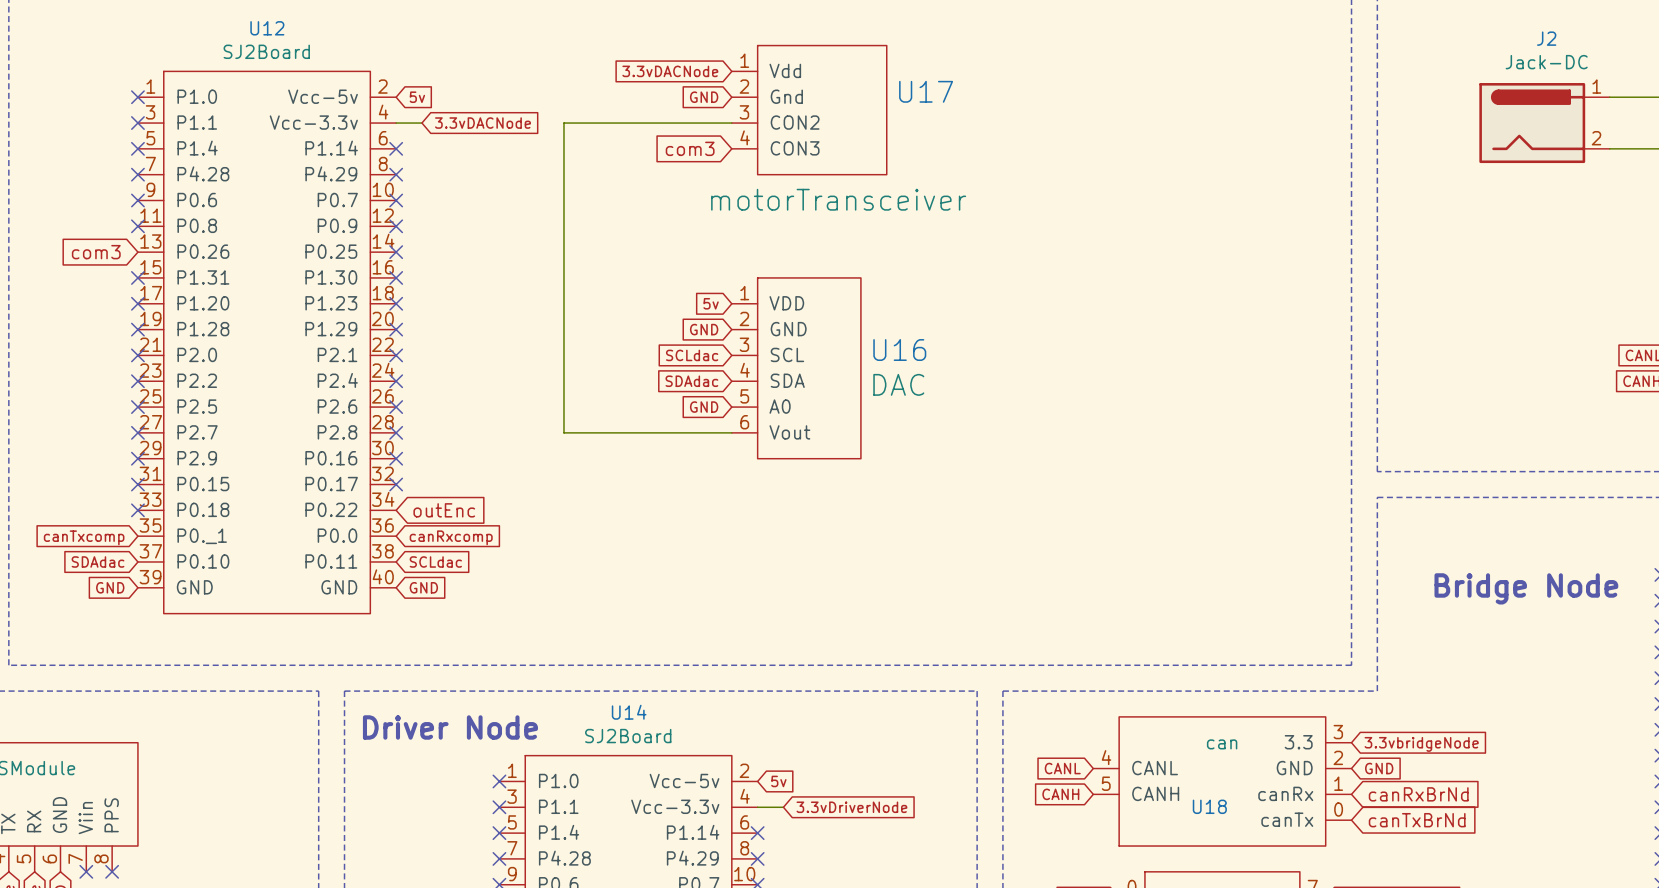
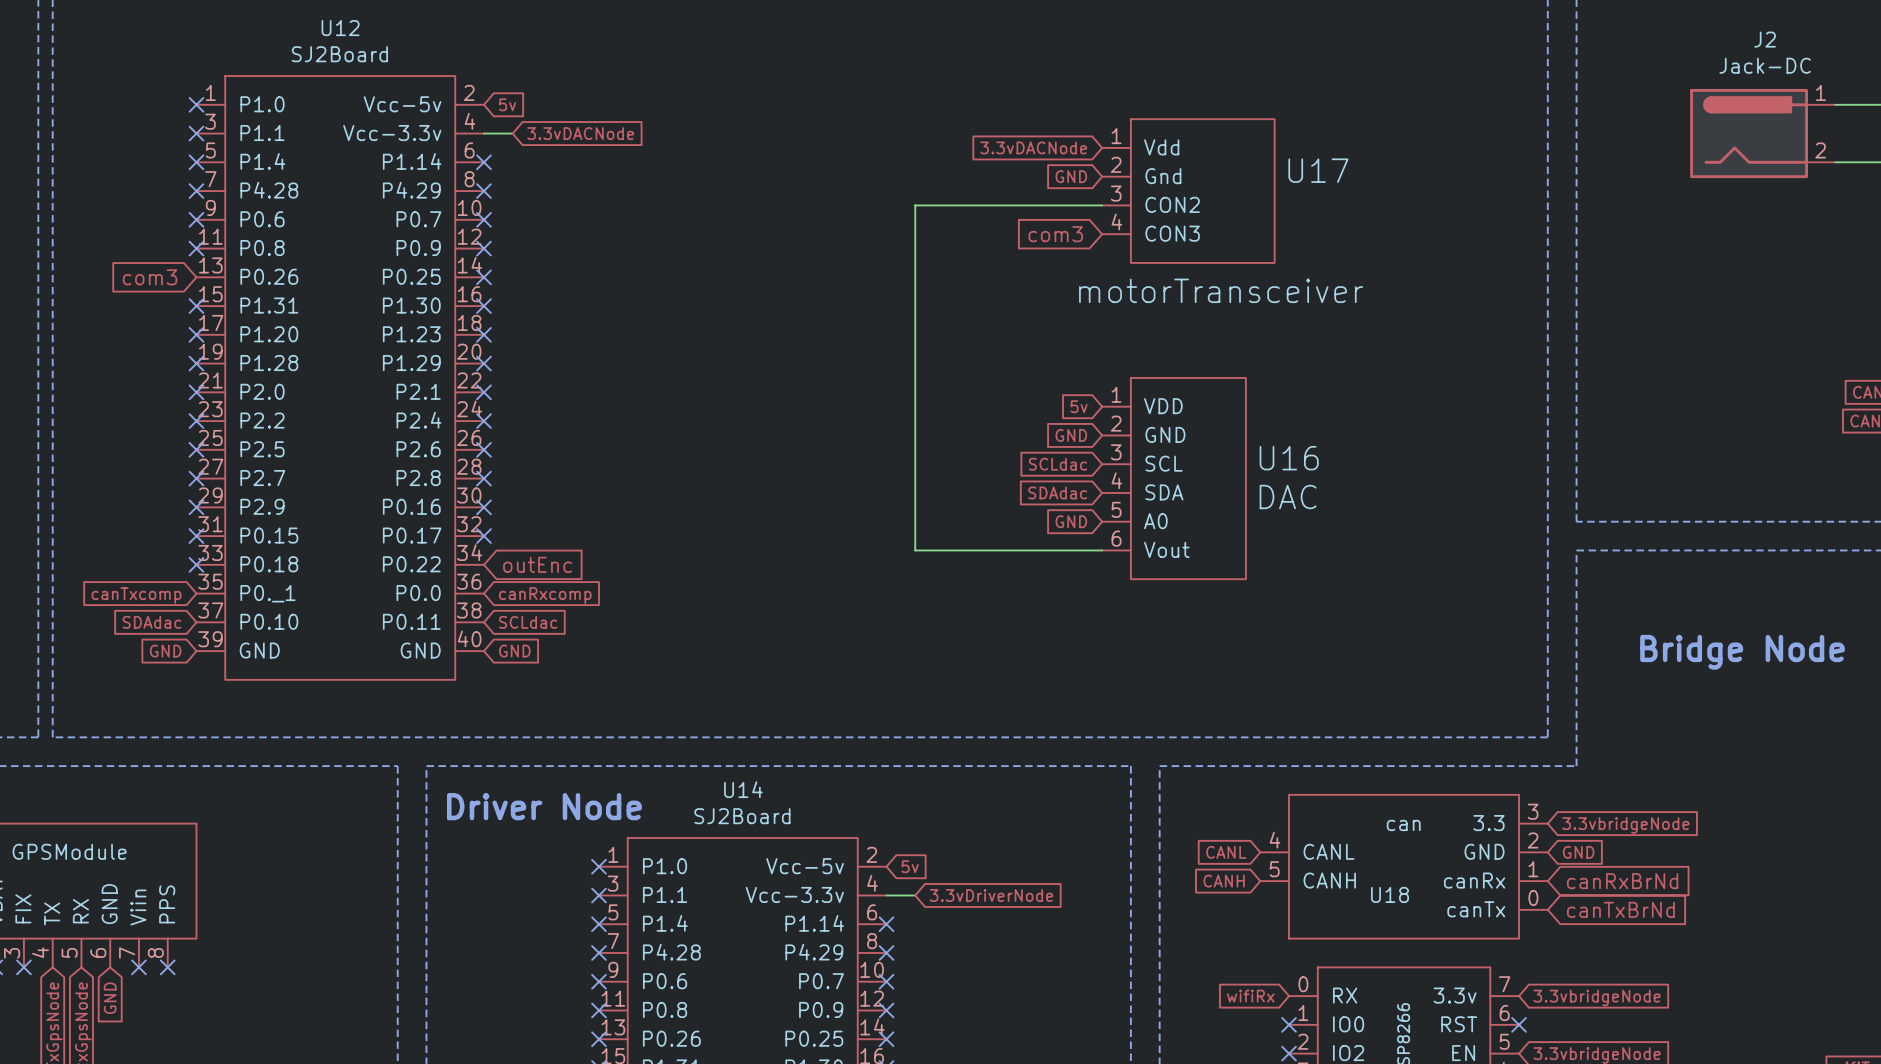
global label position: 3.3vDACNode (670, 71) -> 3.3vDACNode (1033, 147)
global label: GND (704, 97) -> none
U17 position: (809, 110) -> (1188, 191)
wire: (731, 123) (563, 123) (563, 432) (731, 432) -> (1102, 205) (915, 205) (915, 550) (1102, 550)
global label position: com3 (690, 148) -> com3 (1055, 234)
global label: none -> GND (1071, 176)
global label position: 5v (711, 303) -> 5v (1079, 406)
global label: GND (704, 329) -> none
global label position: SCLdac (692, 355) -> SCLdac (1057, 464)
U16 position: (796, 368) -> (1174, 478)
global label position: SDAdac (691, 381) -> SDAdac (1057, 492)
global label: none -> GND (1071, 435)
global label: GND (704, 407) -> none
global label: none -> GND (1071, 521)

